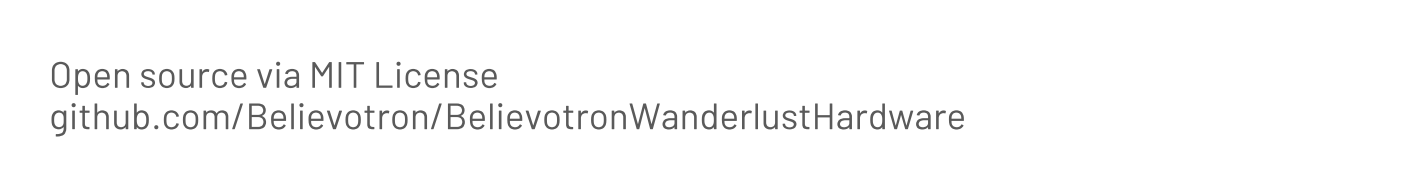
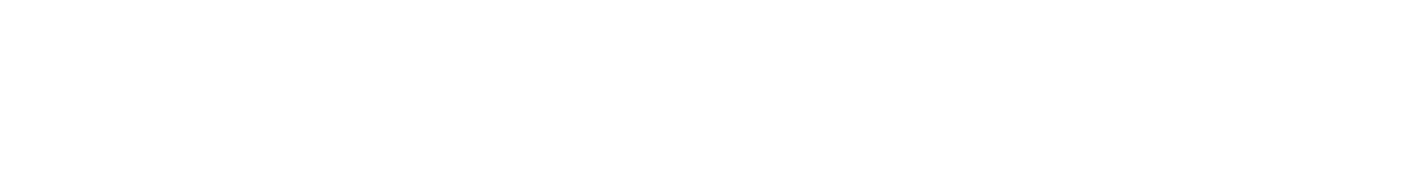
text: Open source via MIT License (274, 78) -> none
text: github.com/Believotron/BelievotronWanderlustHardware (507, 119) -> none

